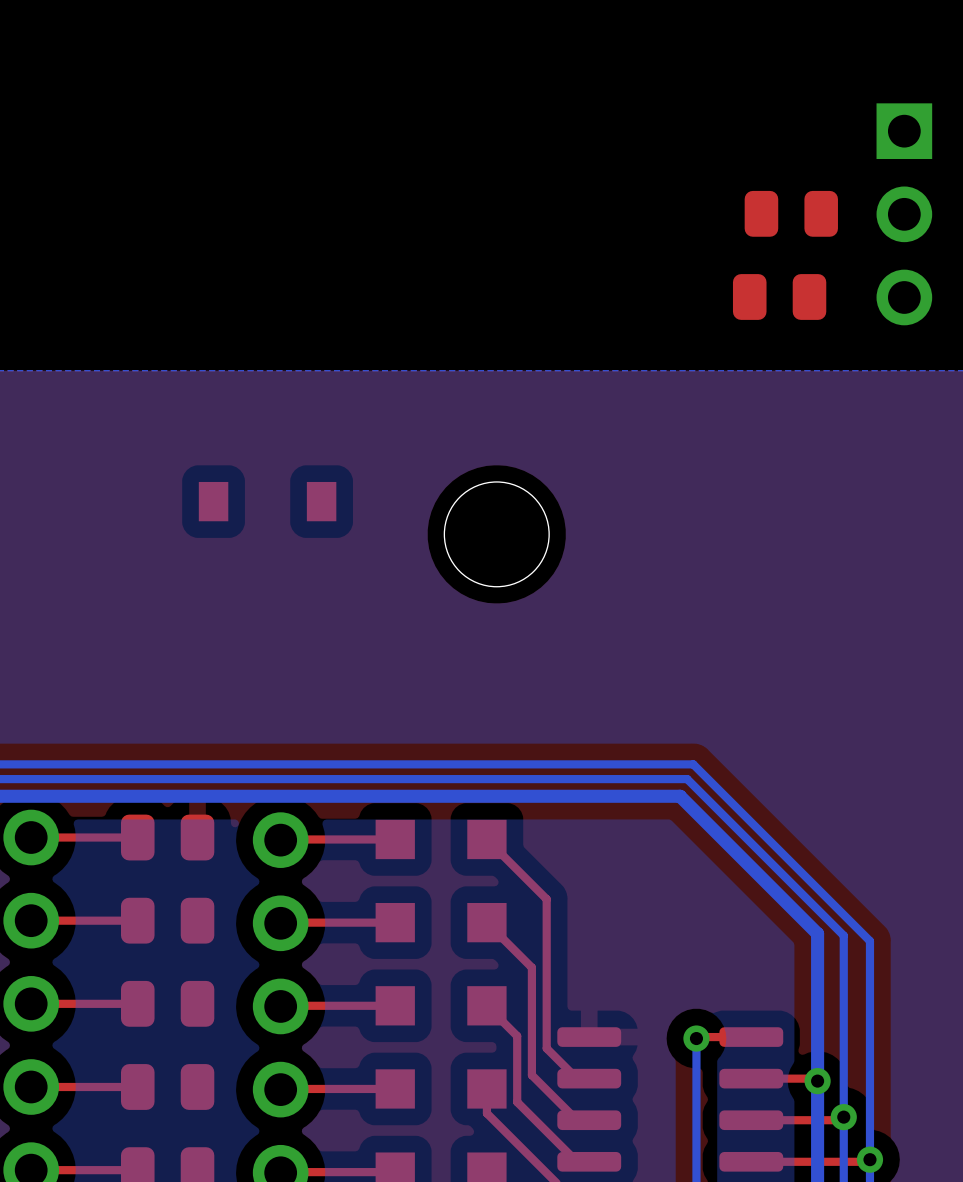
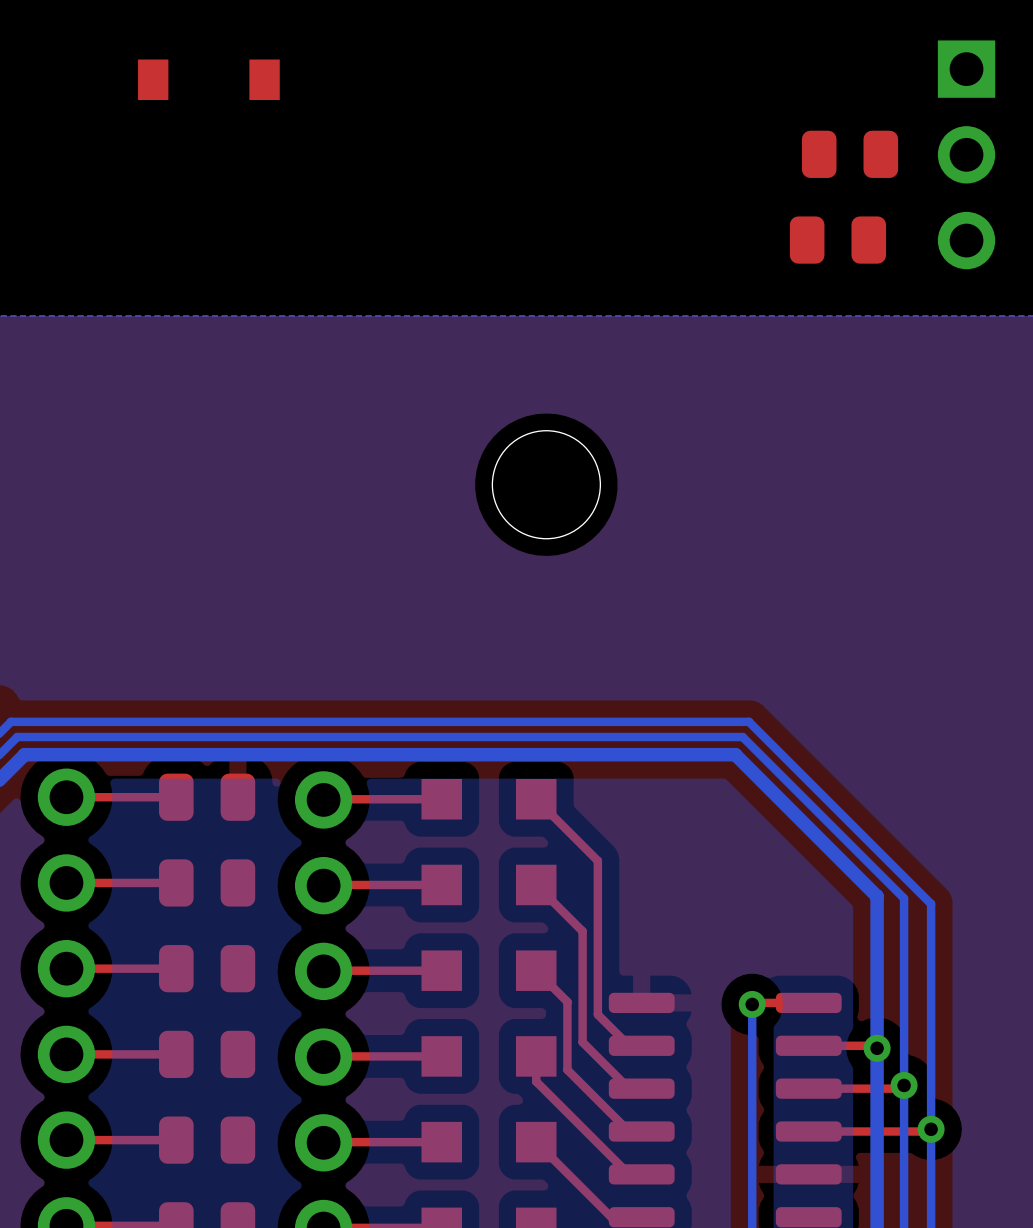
part position: (267, 501) -> (208, 79)

